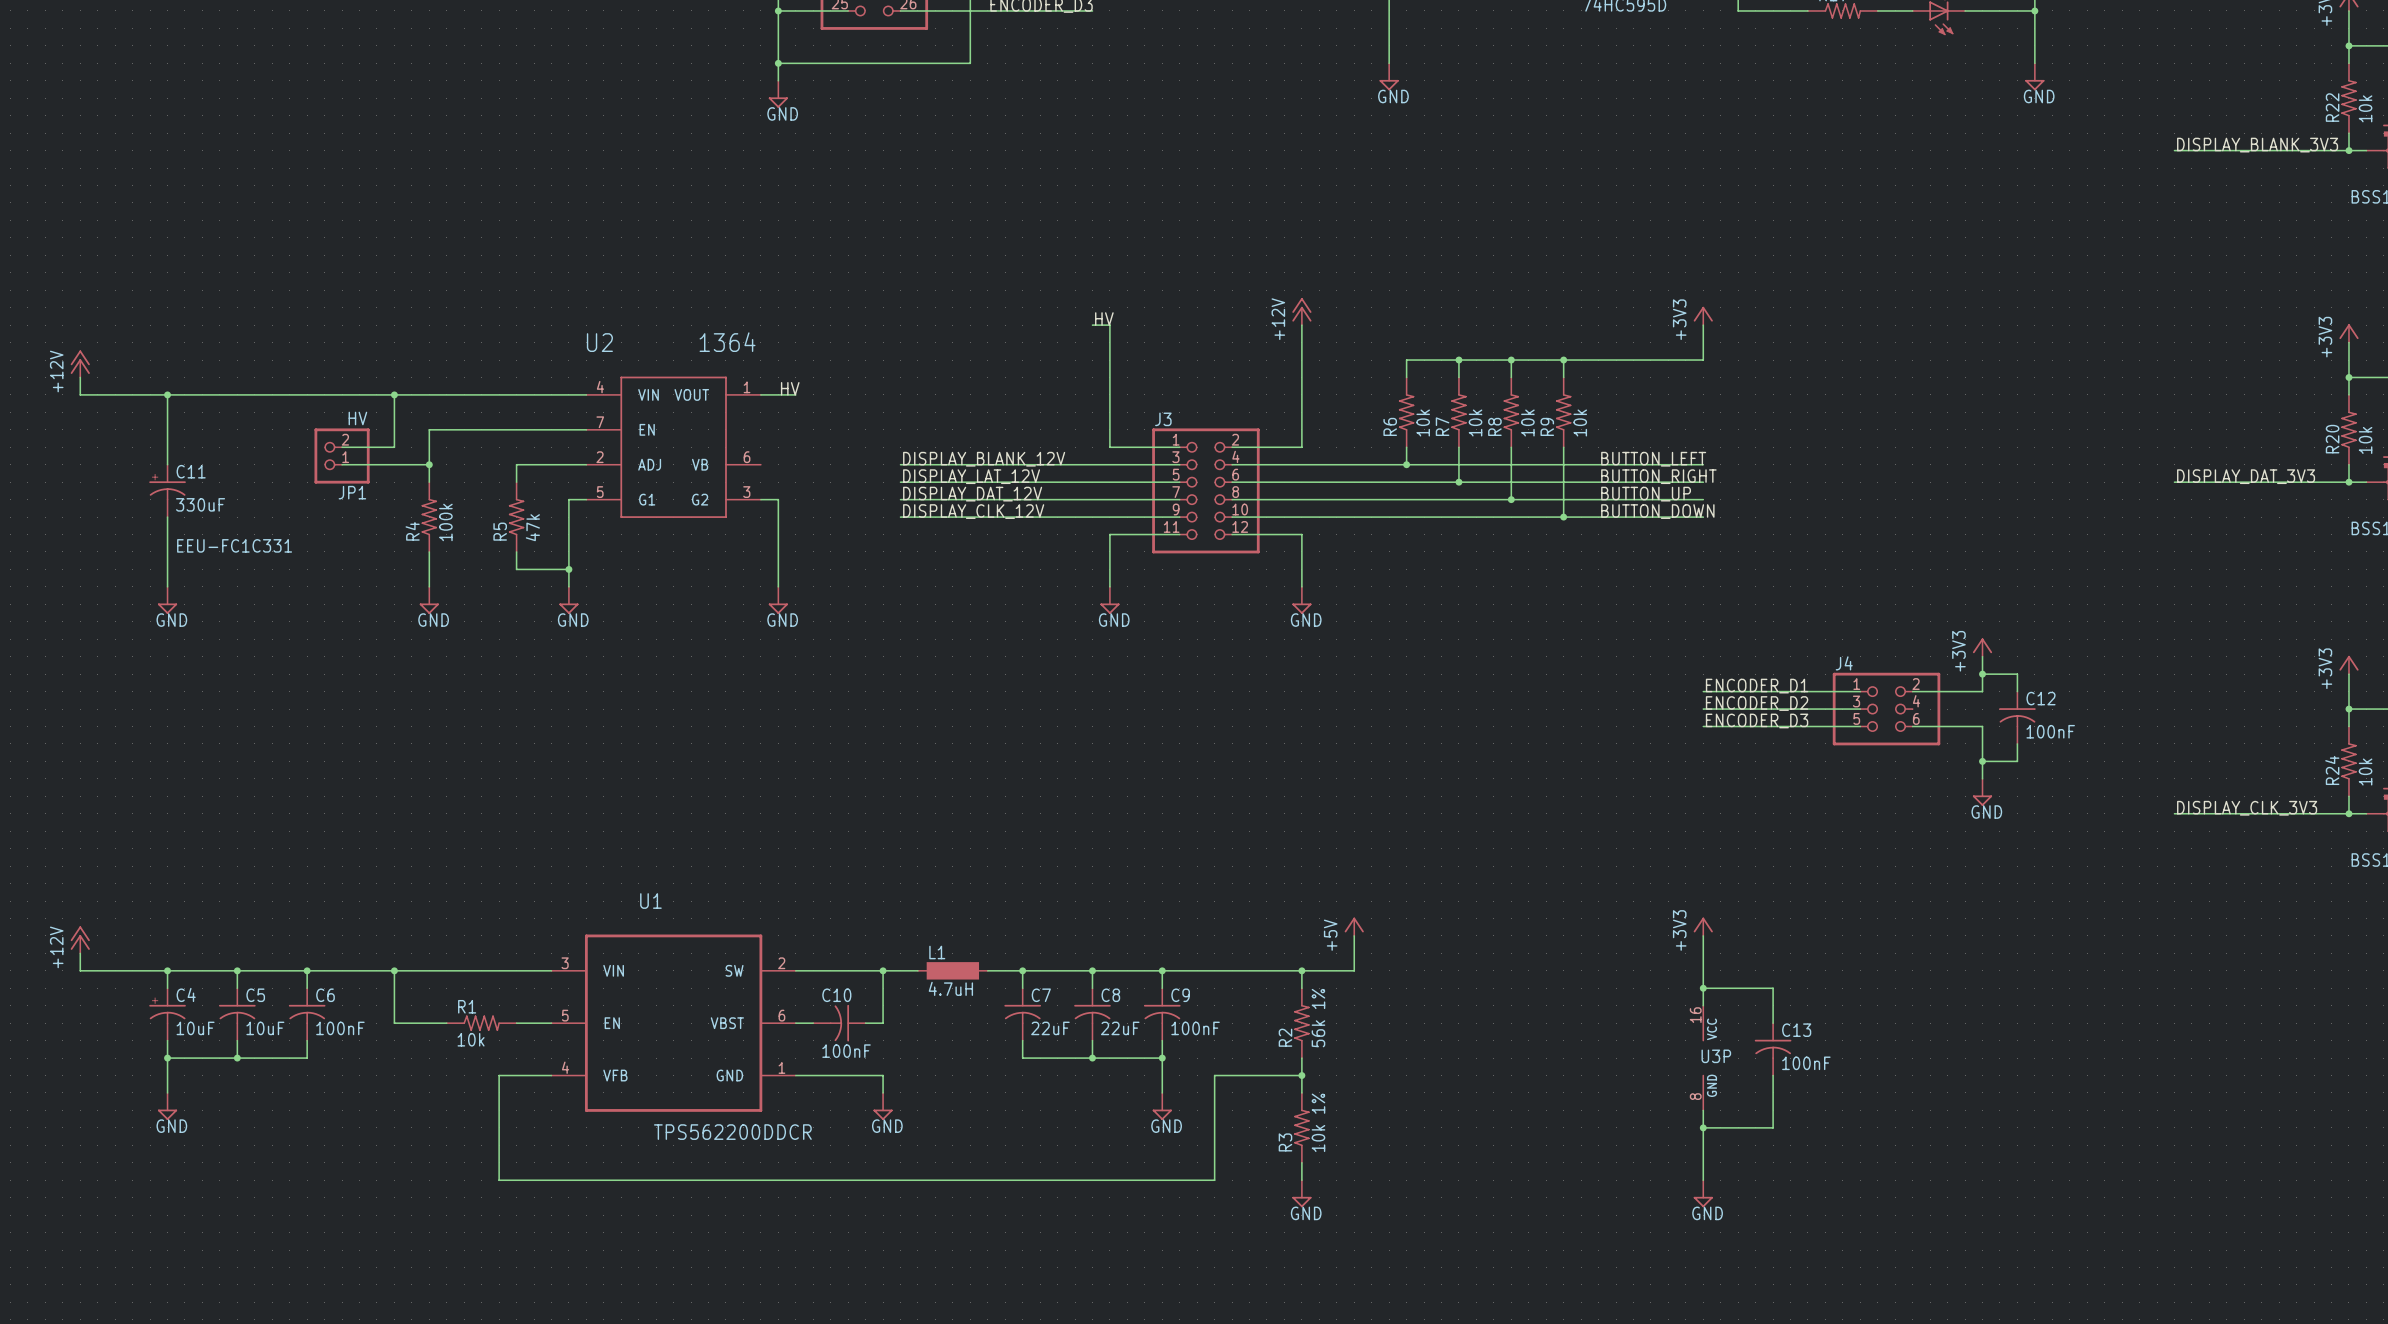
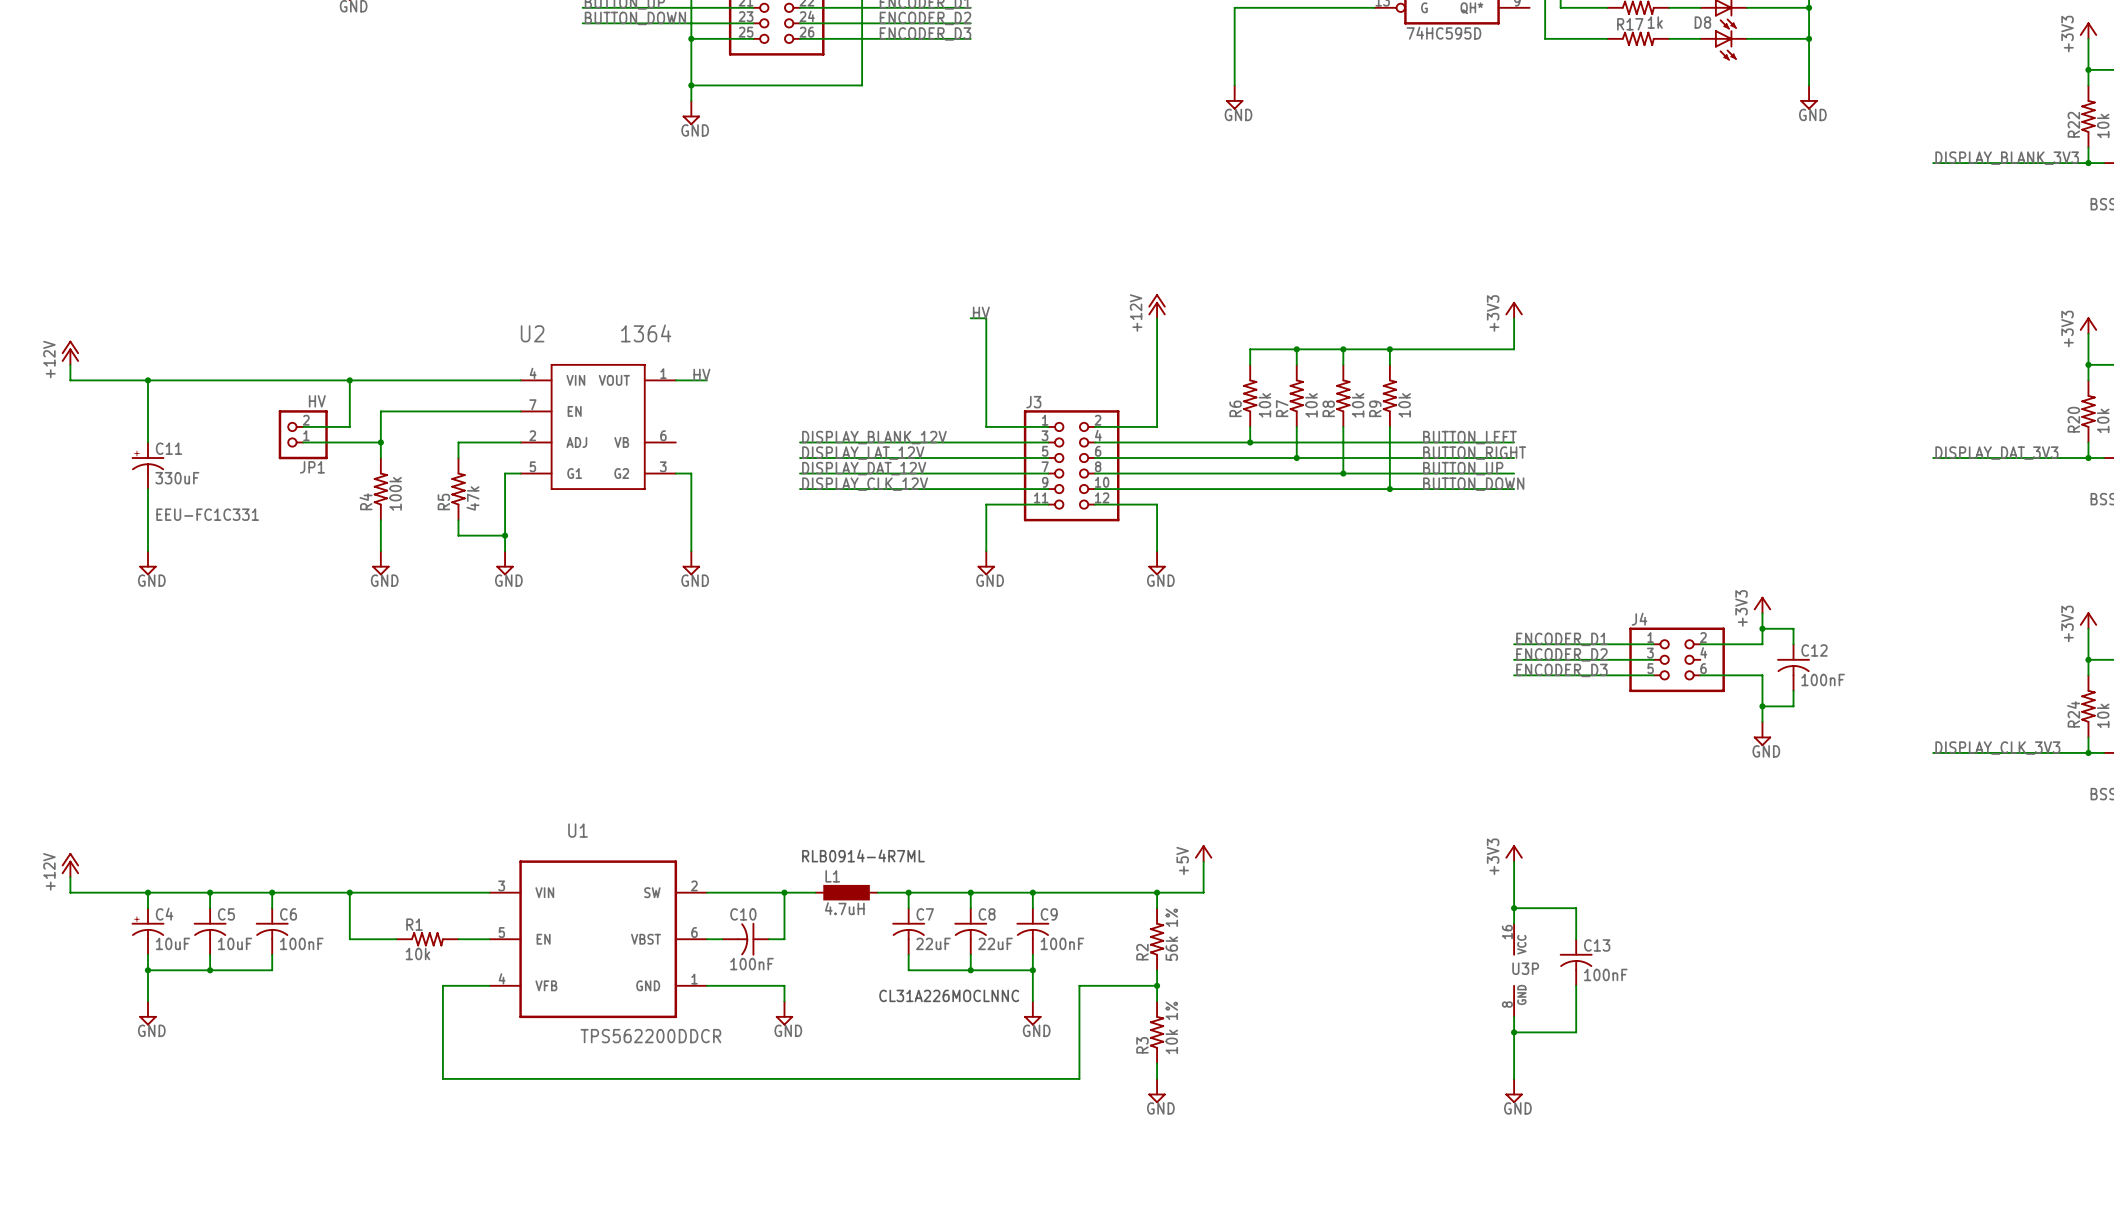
text: none -> RLB0914-4R7ML (863, 855)
text: none -> CL31A226MOCLNNC (949, 995)

